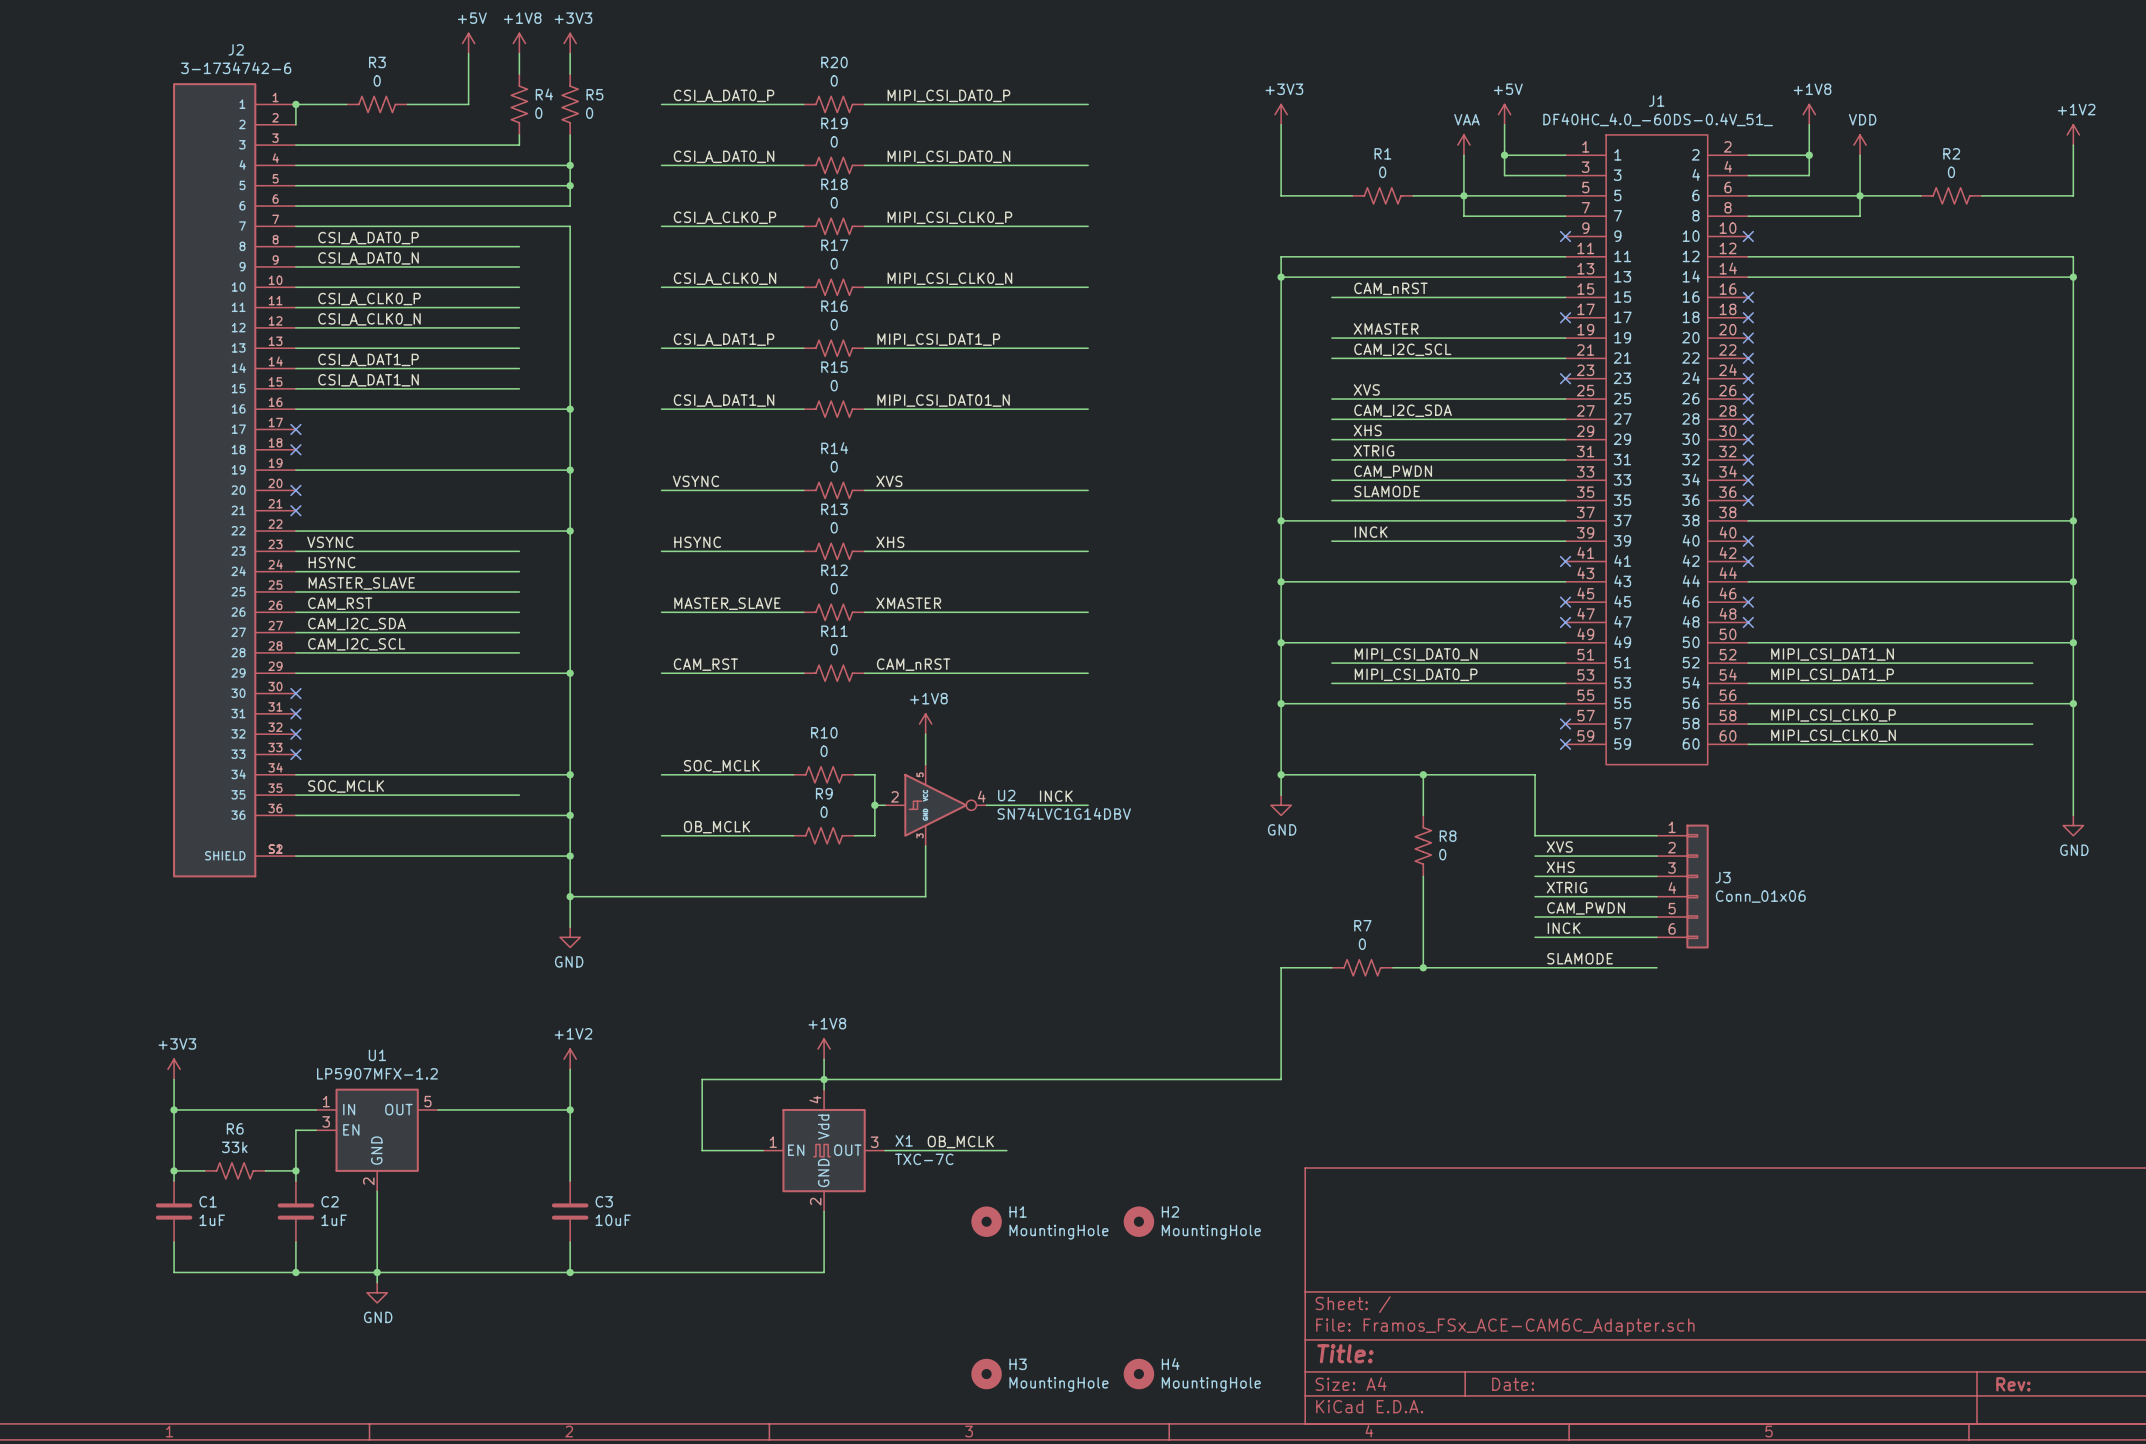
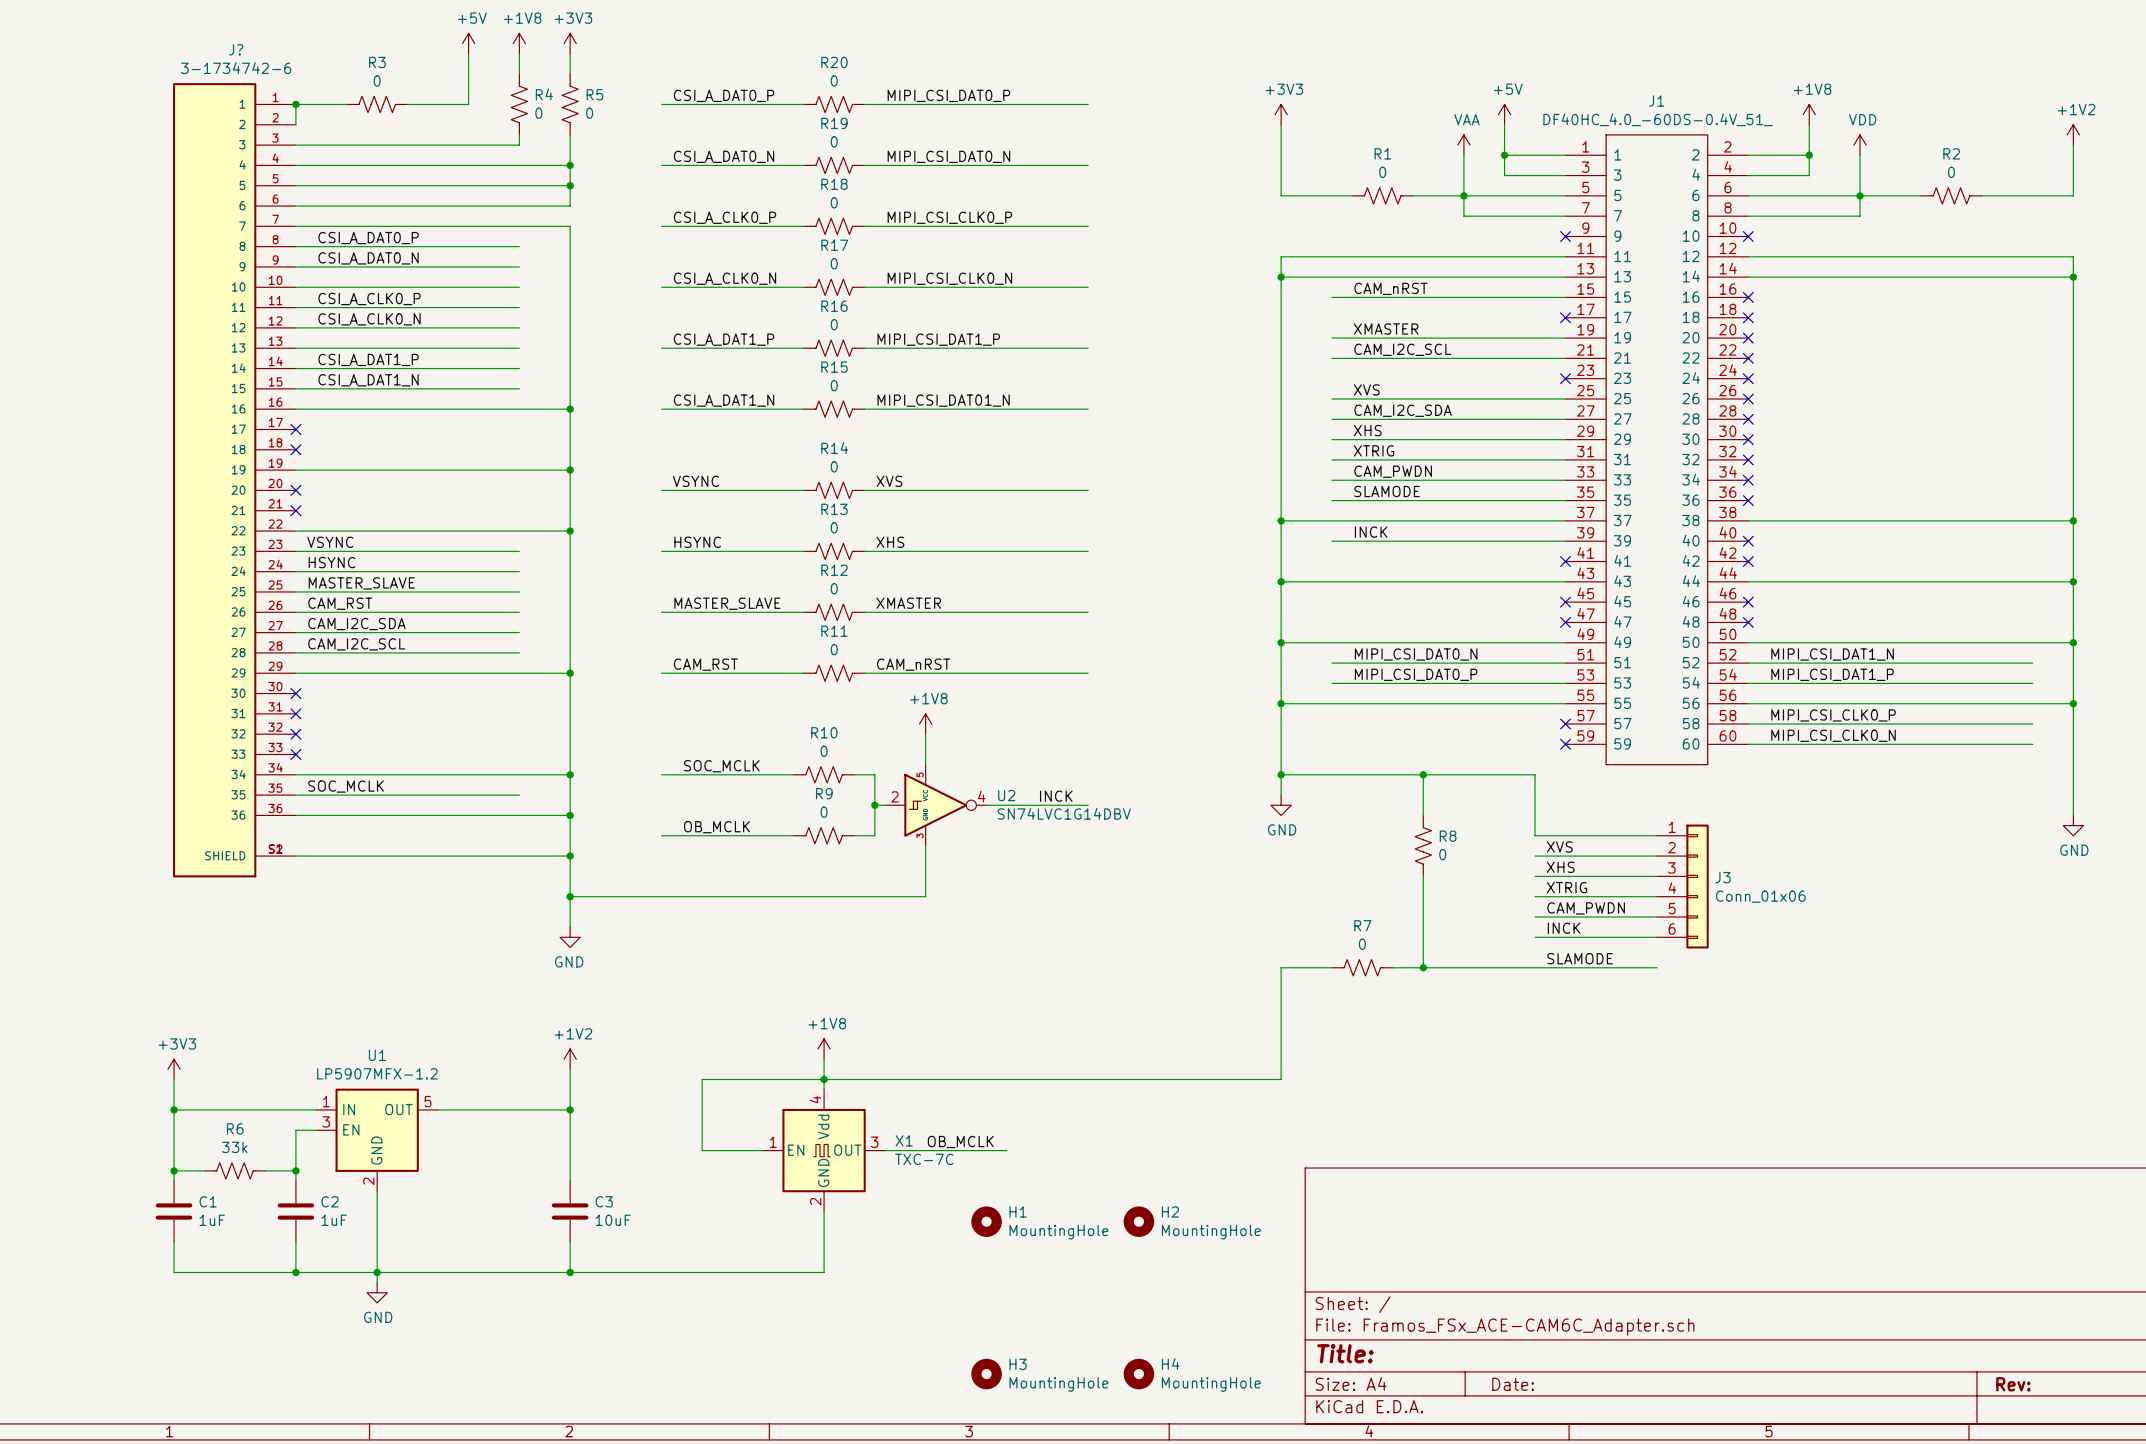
J2 name: J2 (236, 49) -> J? (236, 49)

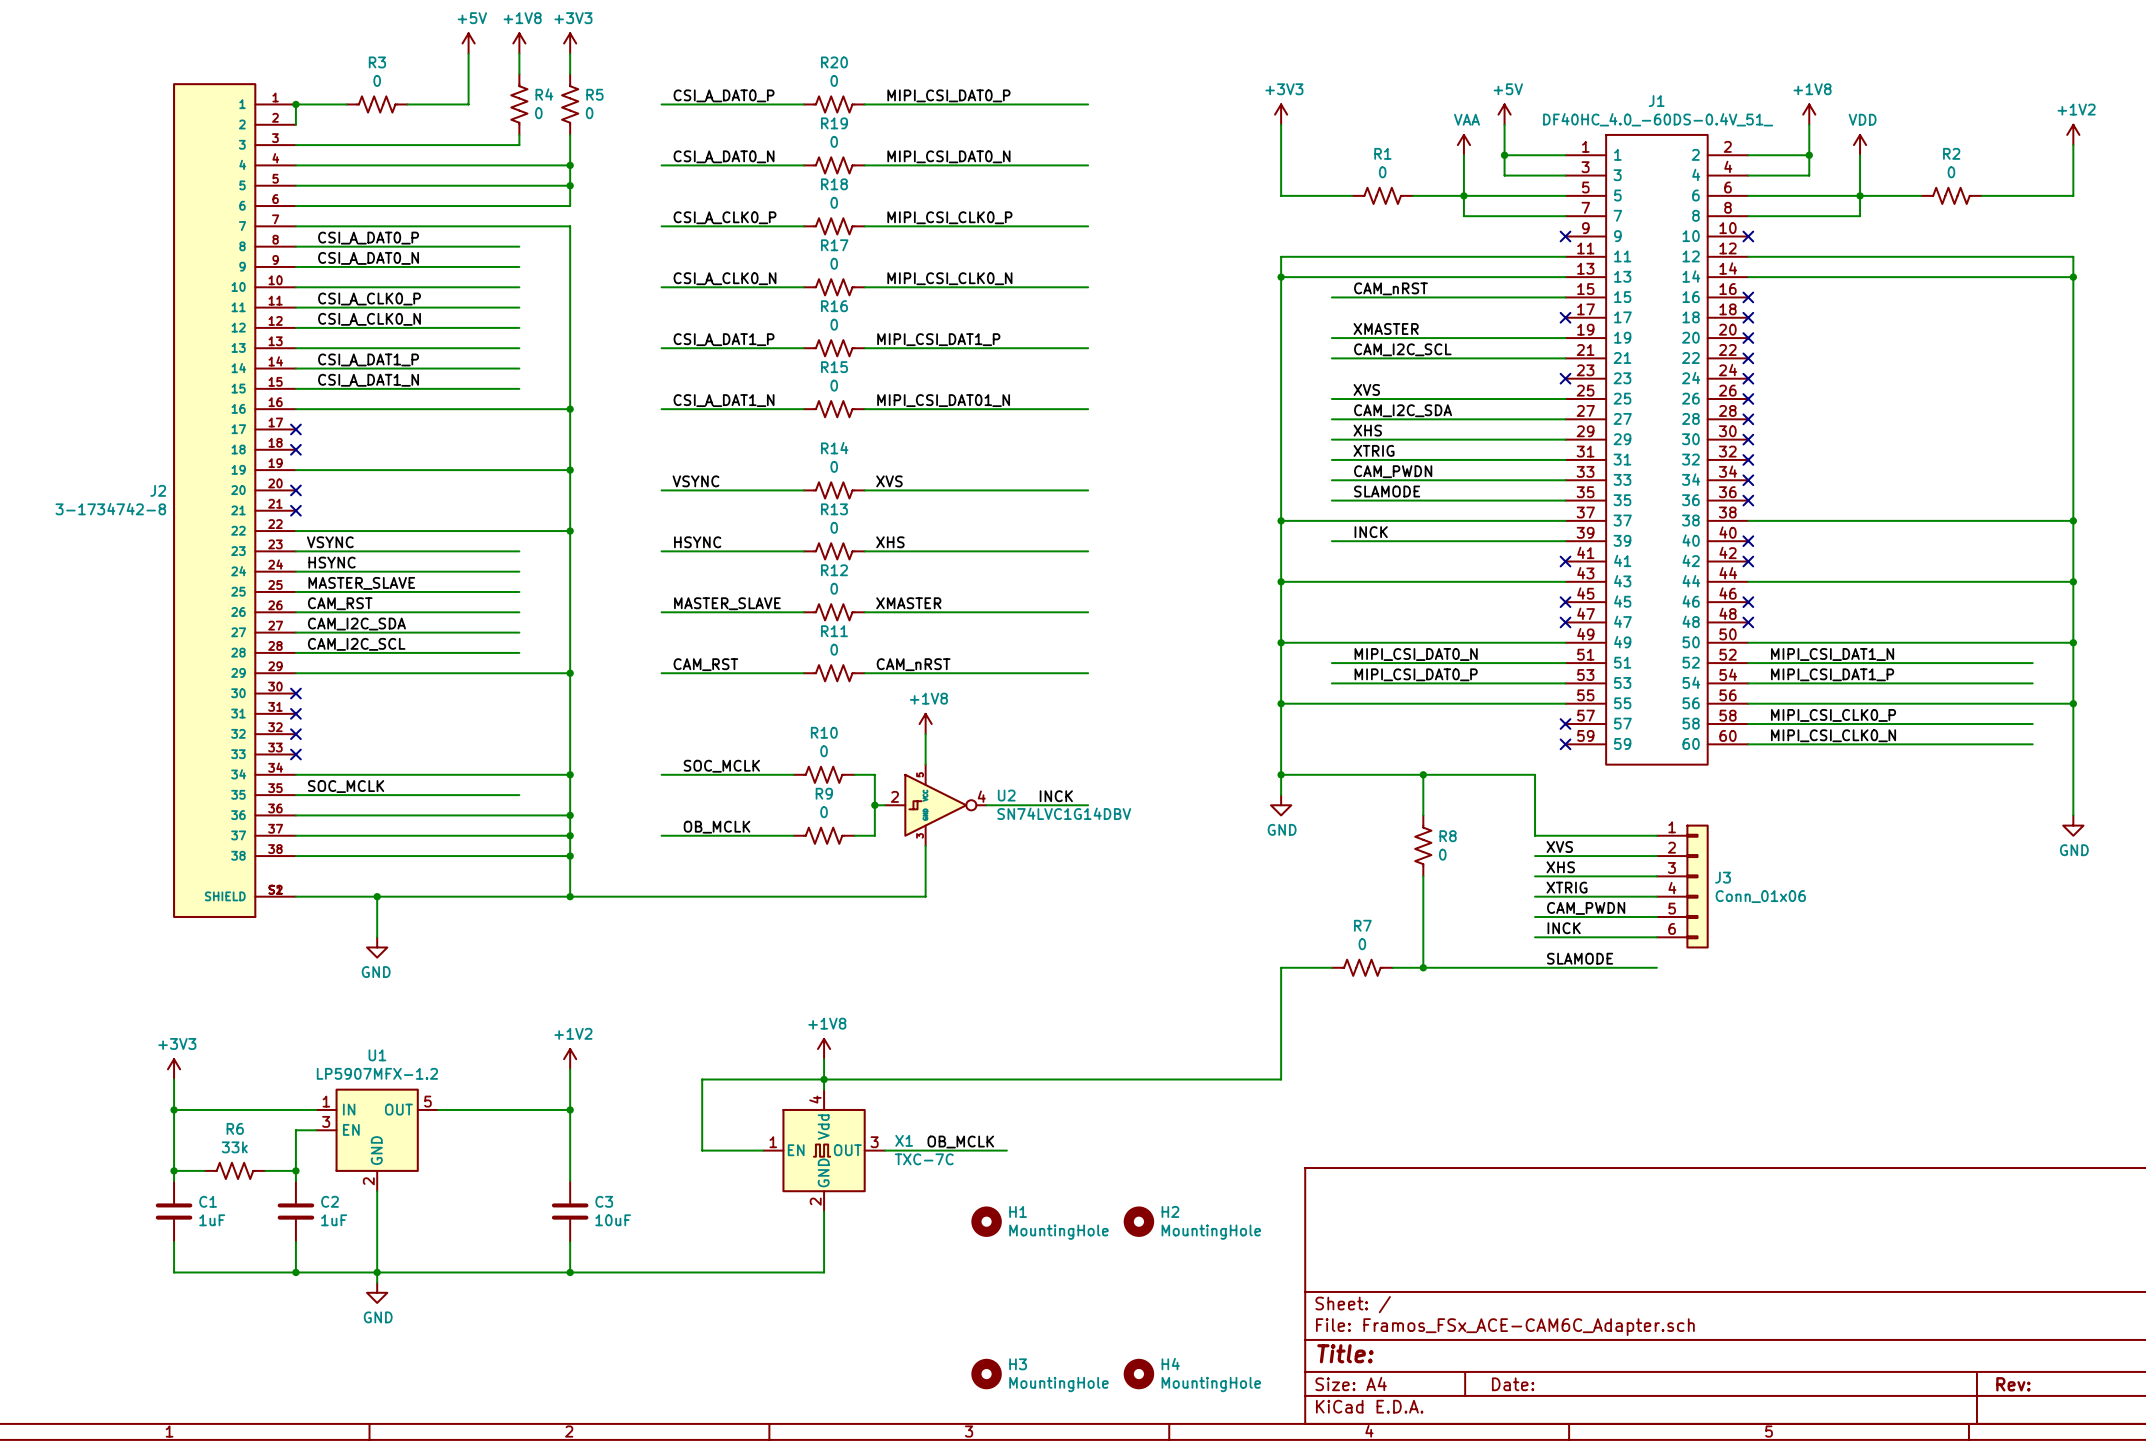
J?: 3-1734742-6 (234, 480) -> none
J2: none -> 3-1734742-8 (234, 500)
wire: none -> (295, 835) (570, 835)
junction: none -> (570, 835)
wire: none -> (377, 896) (377, 937)
junction: none -> (377, 896)
wire: (570, 896) (570, 927) -> (570, 896) (295, 896)
power symbol position: GND (570, 937) -> GND (377, 947)

